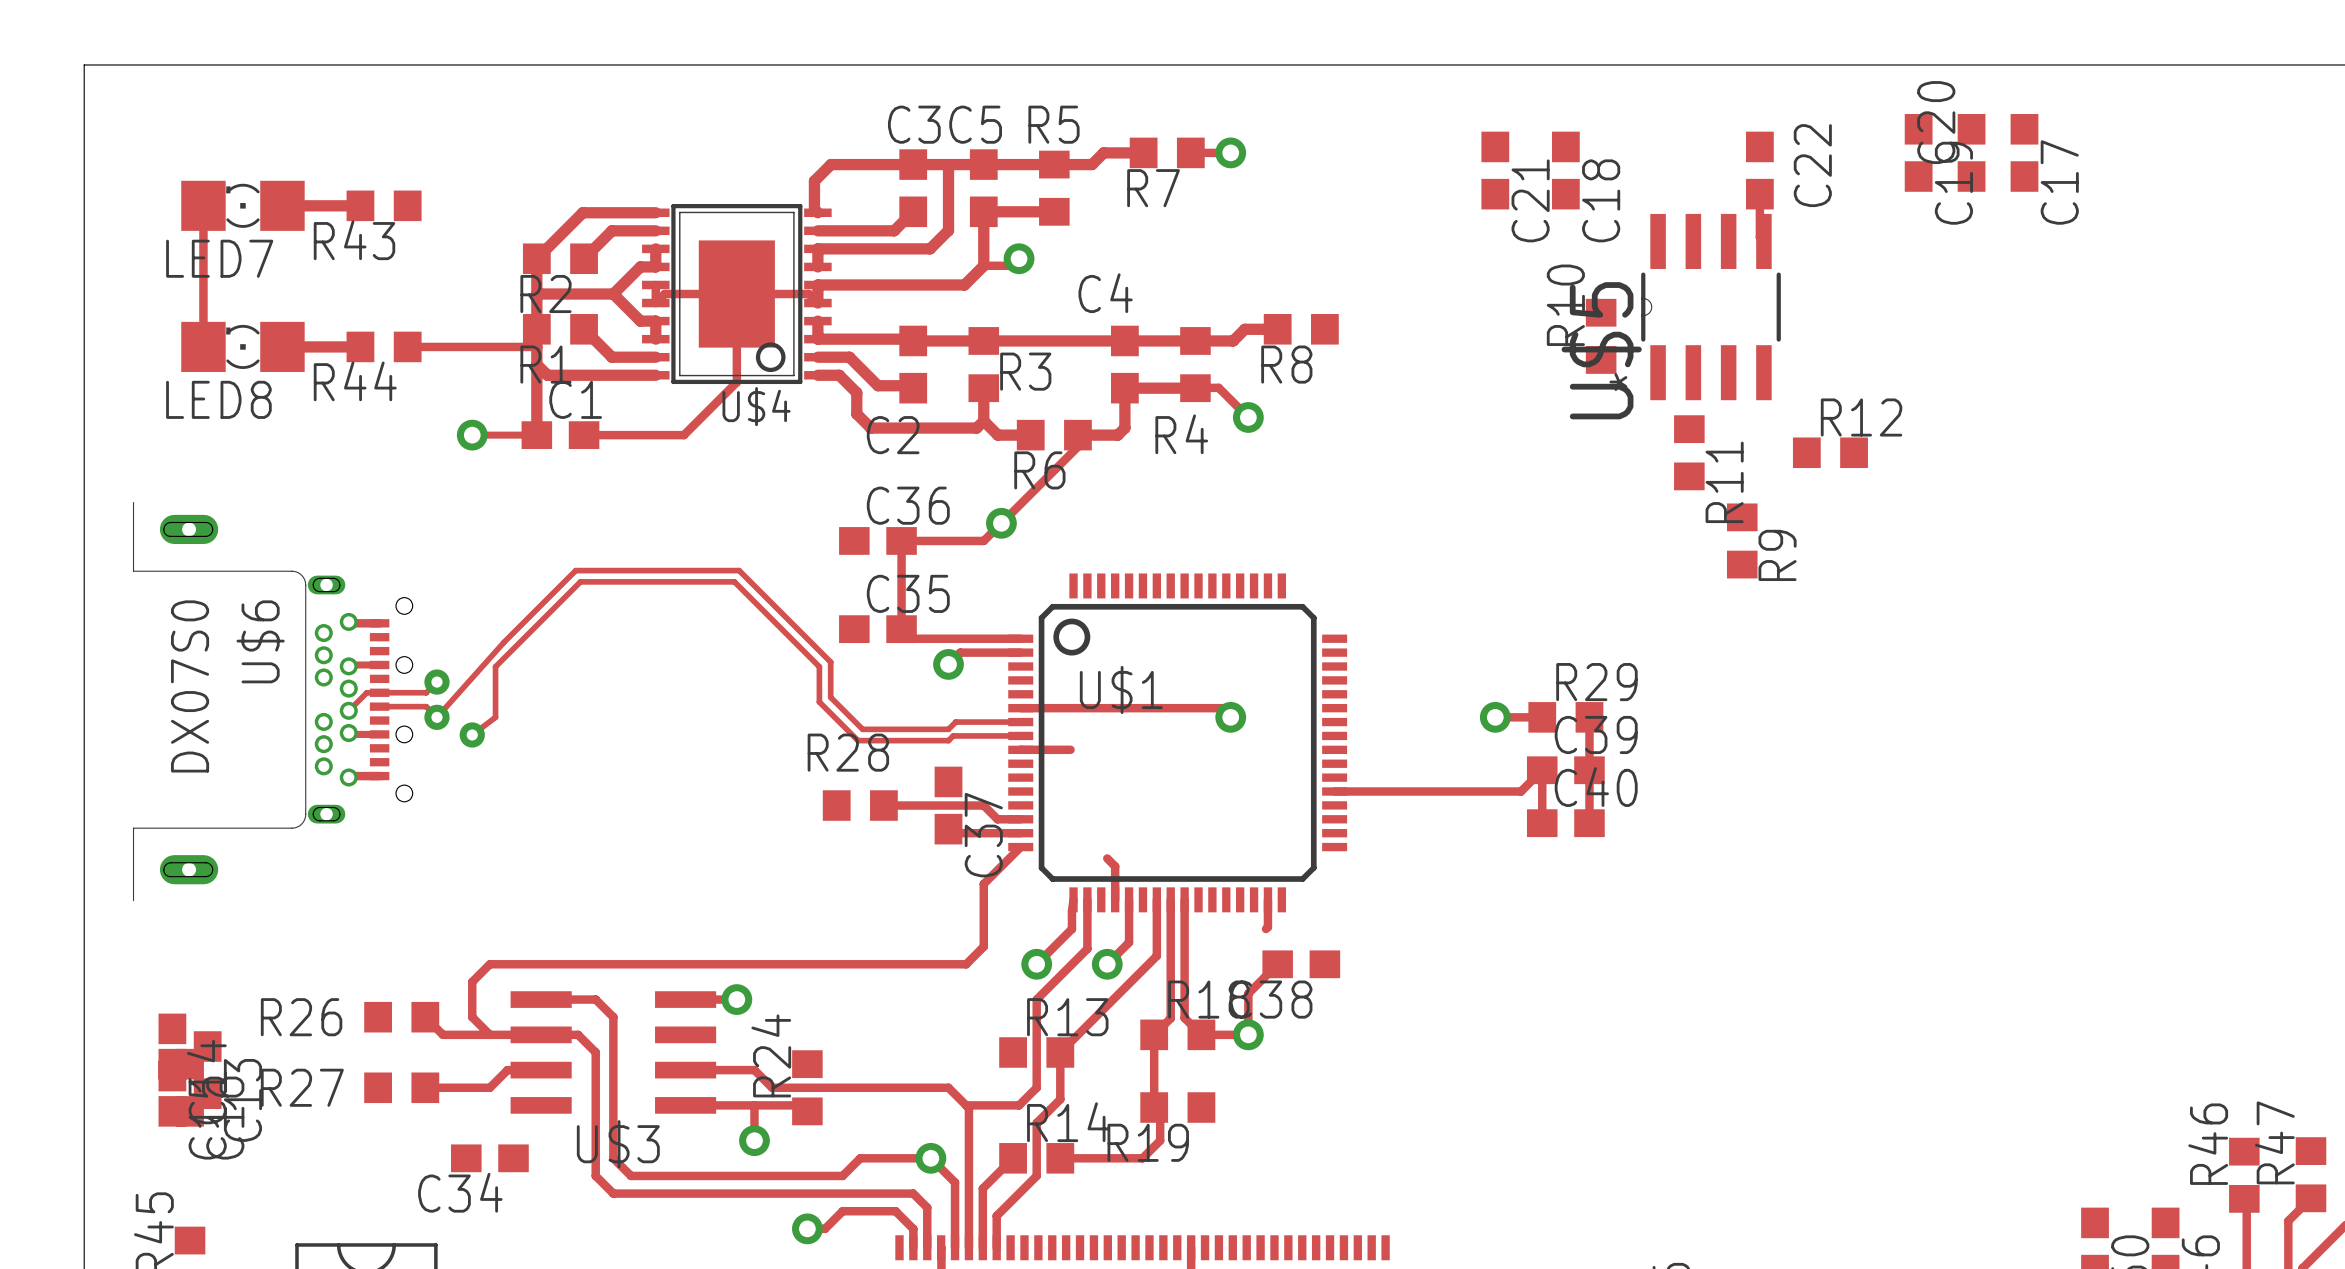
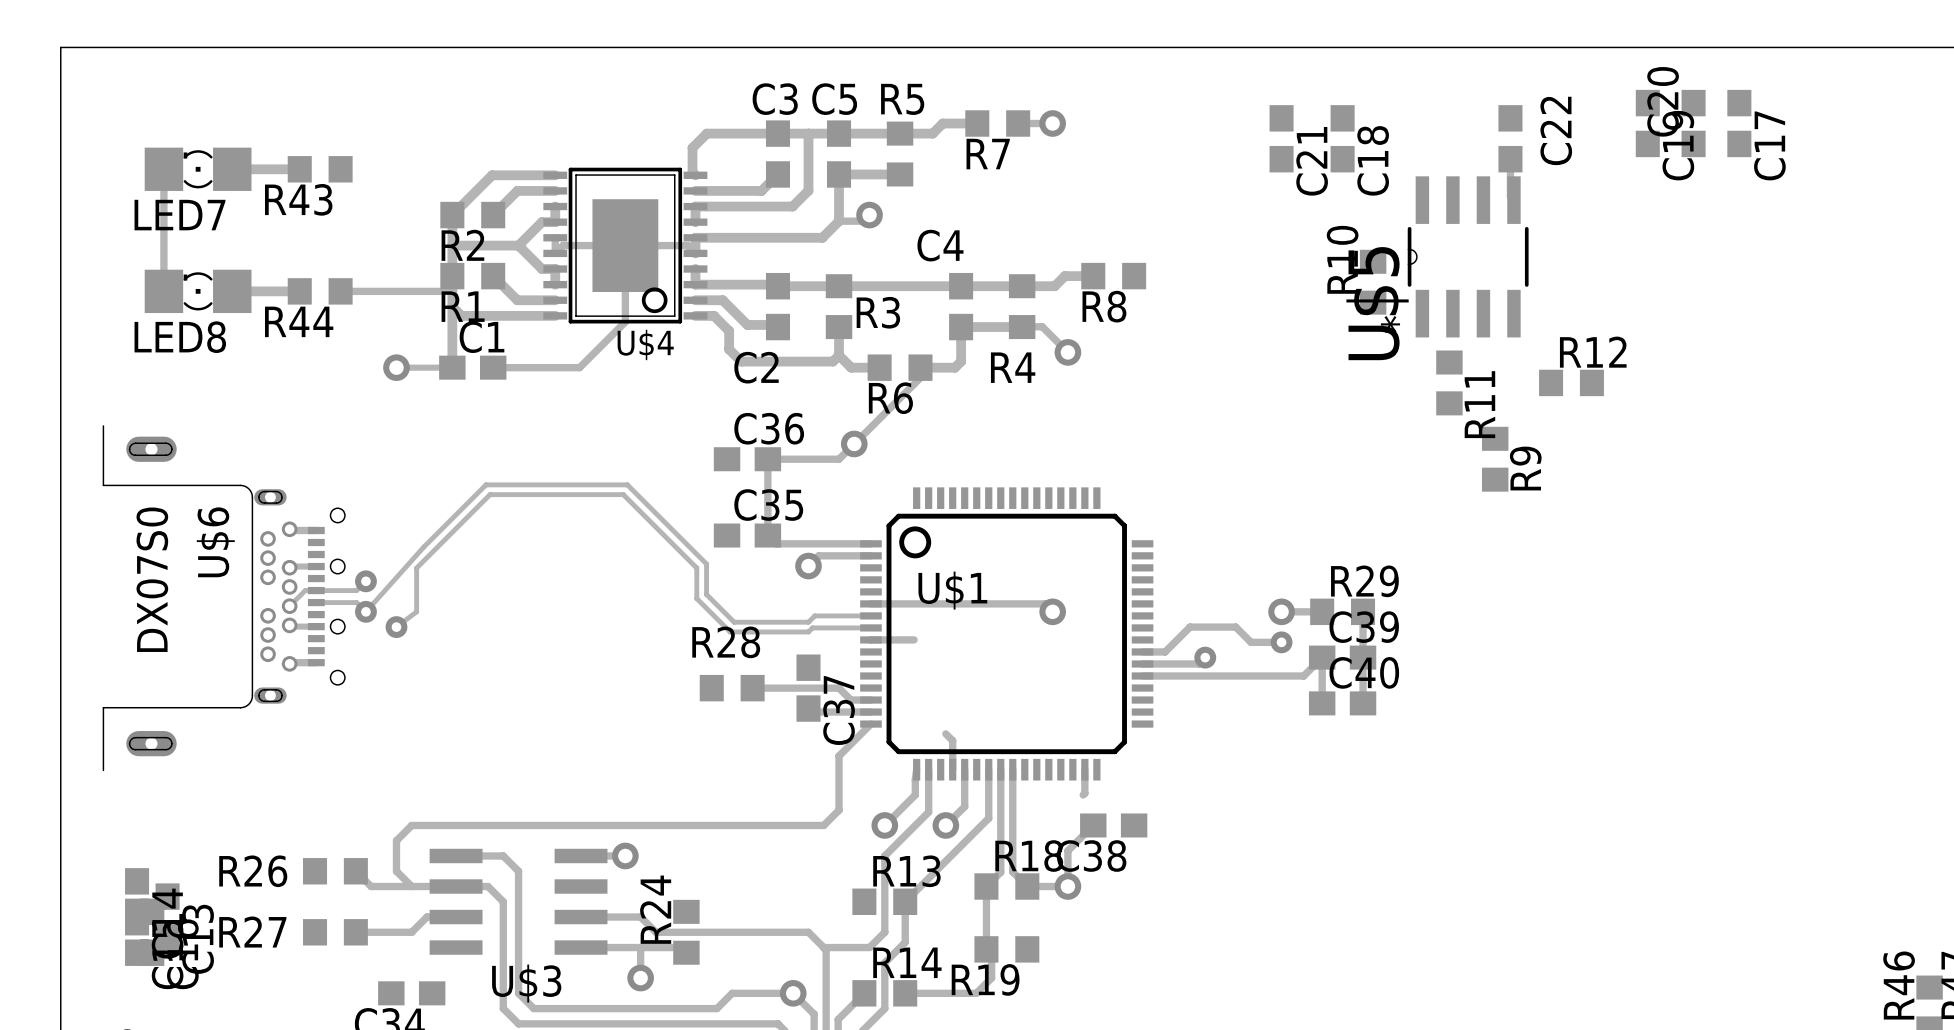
track: none -> (1281, 642) (1251, 642) (1235, 627) (1190, 627) (1165, 651) (1142, 651)
via: none -> (1281, 642)
track: none -> (1205, 657) (1198, 663) (1142, 663)
via: none -> (1205, 657)

